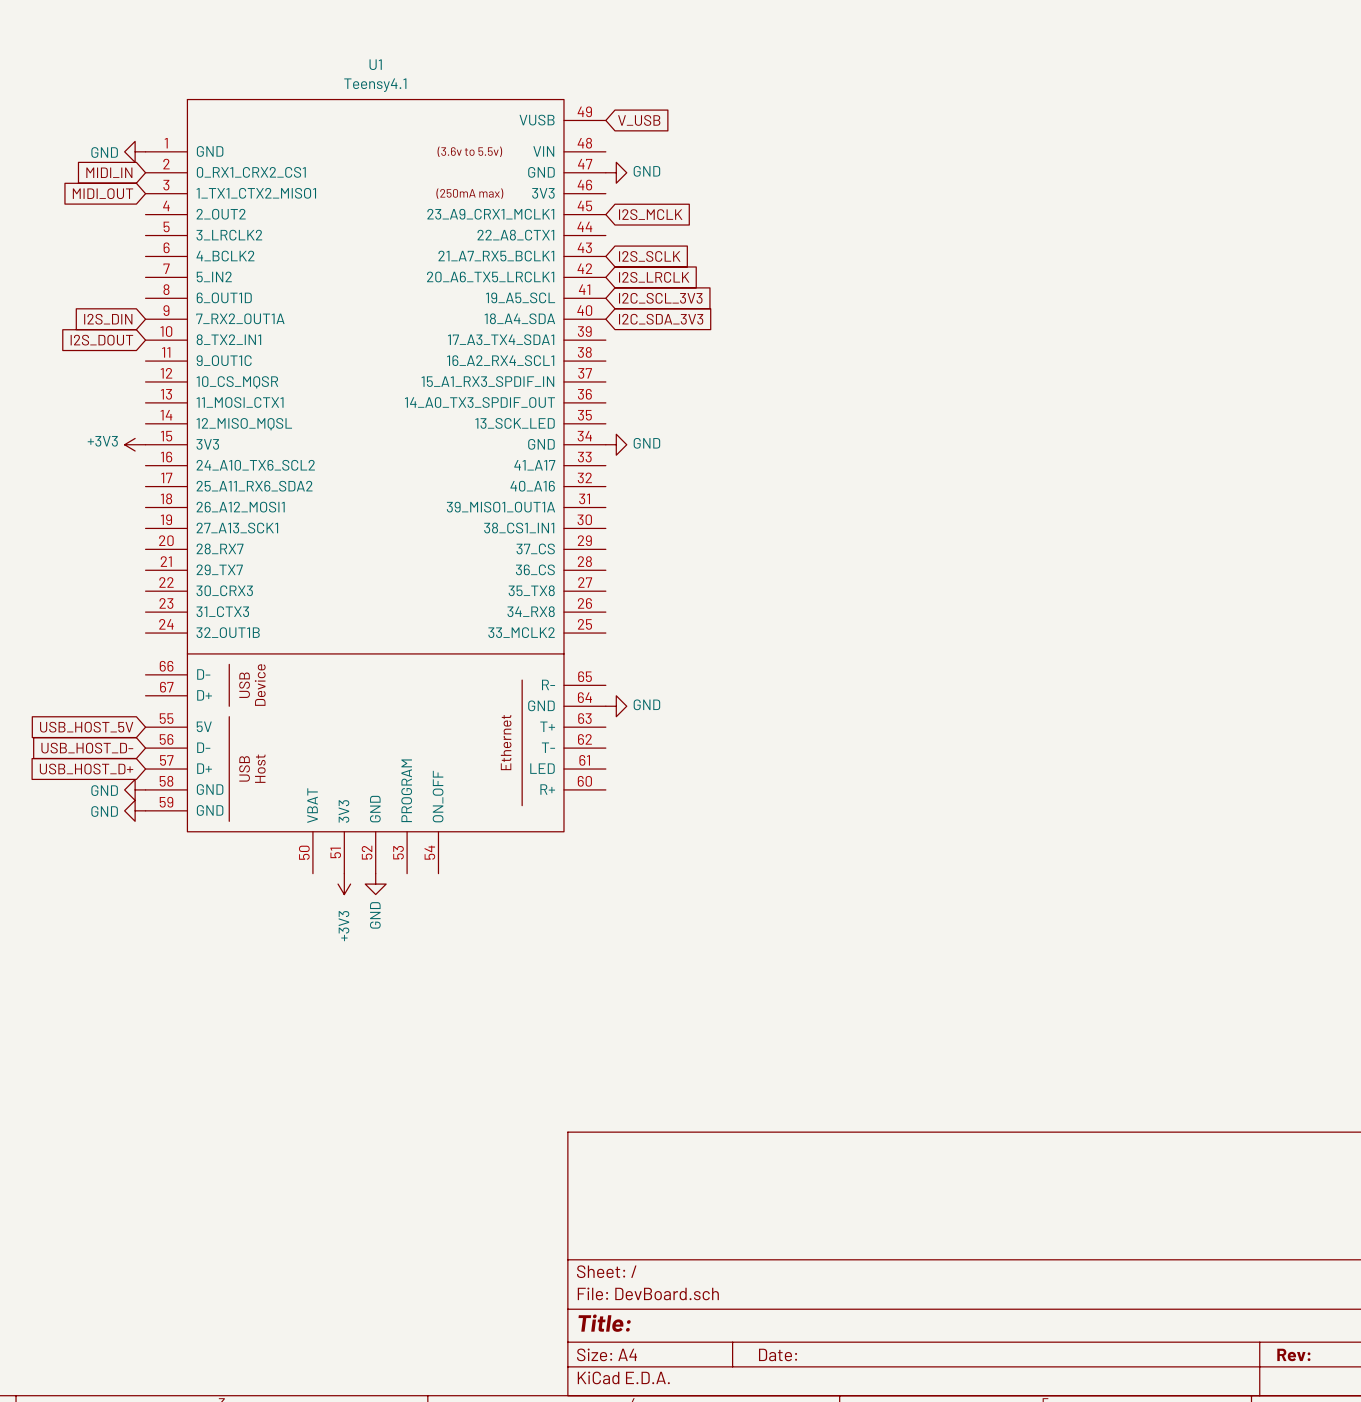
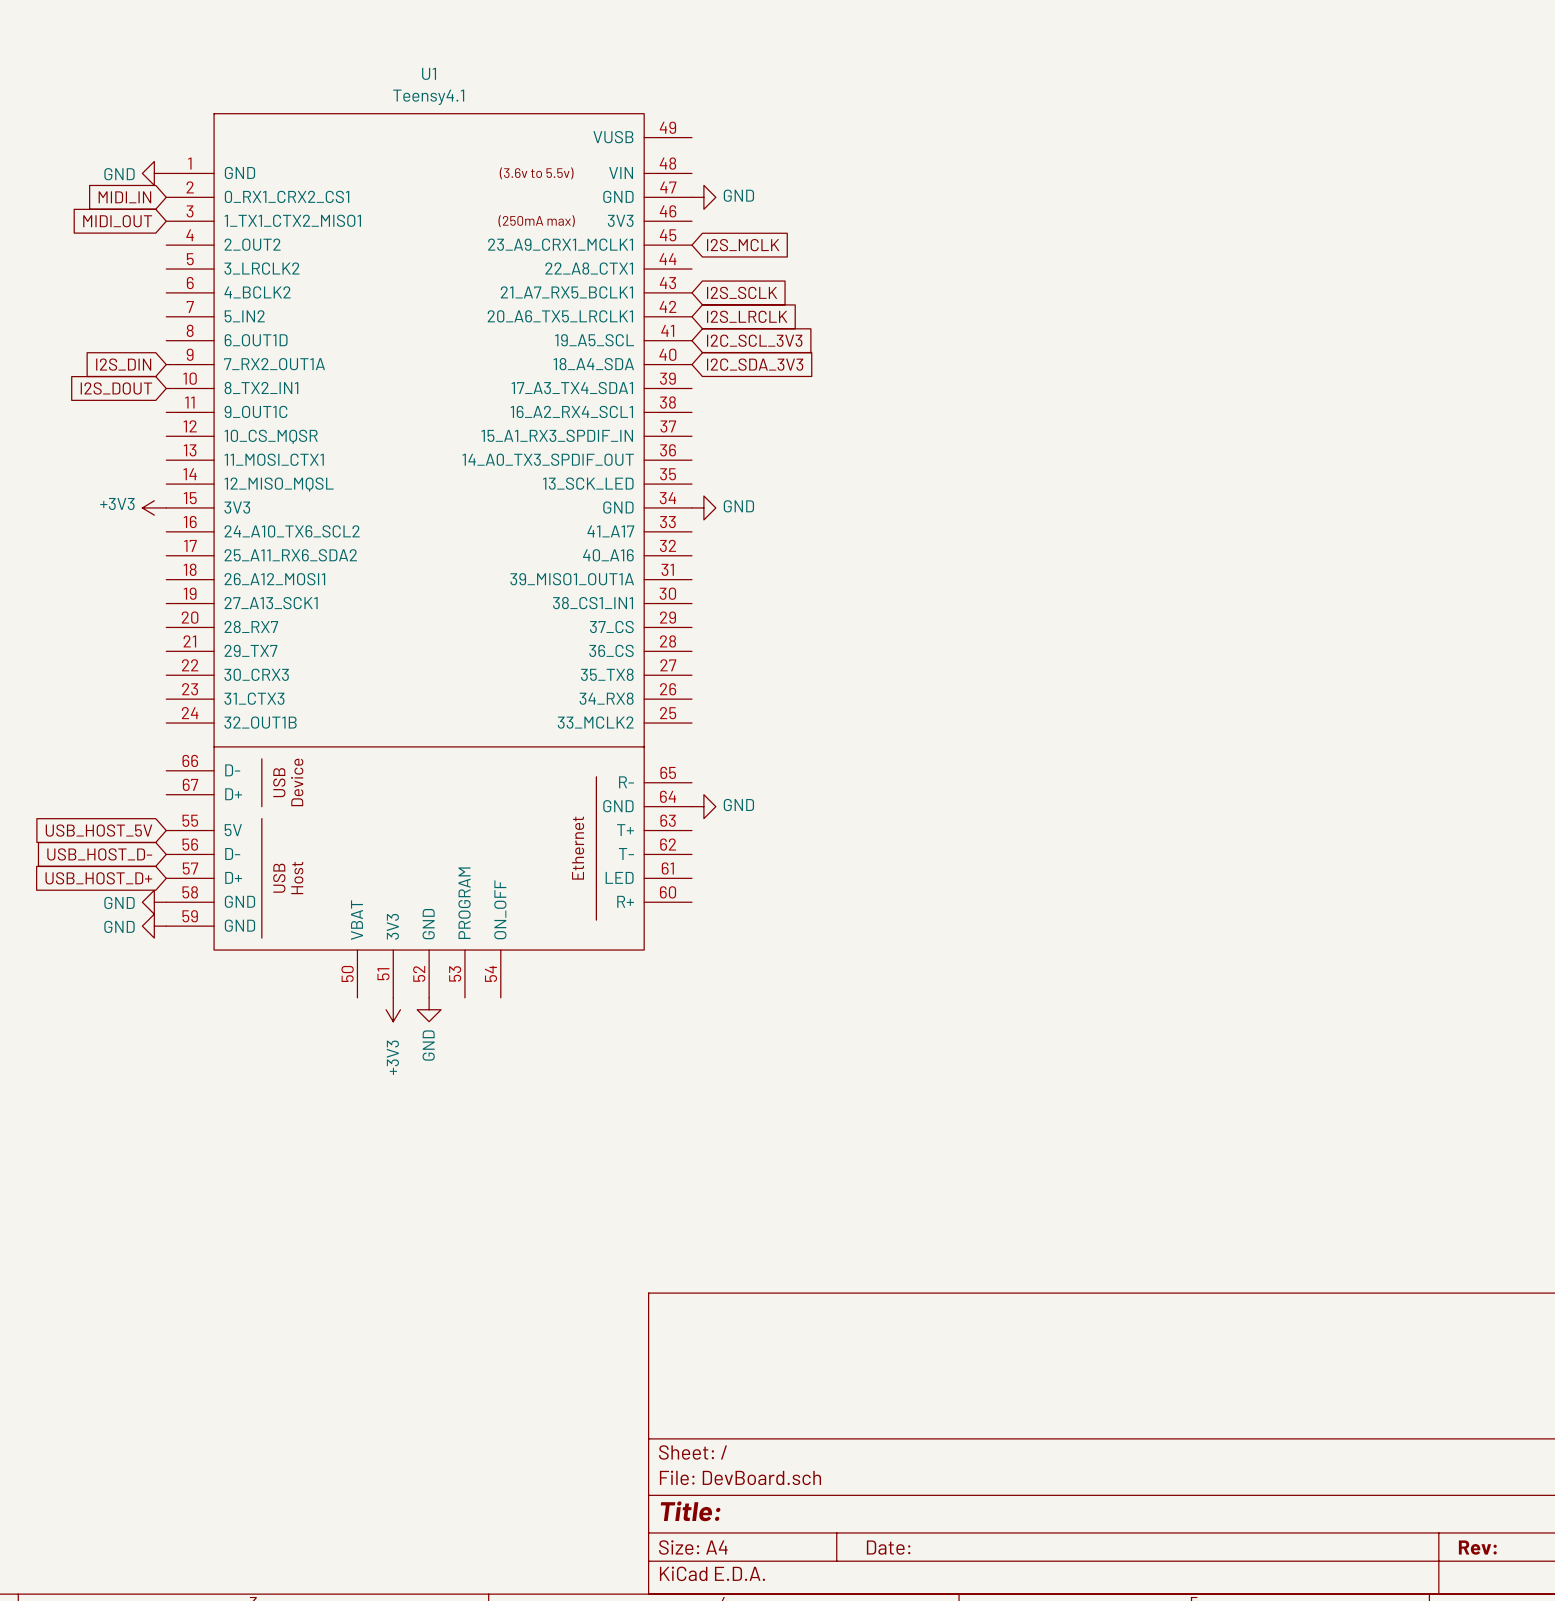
global label: V_USB (639, 120) -> none

